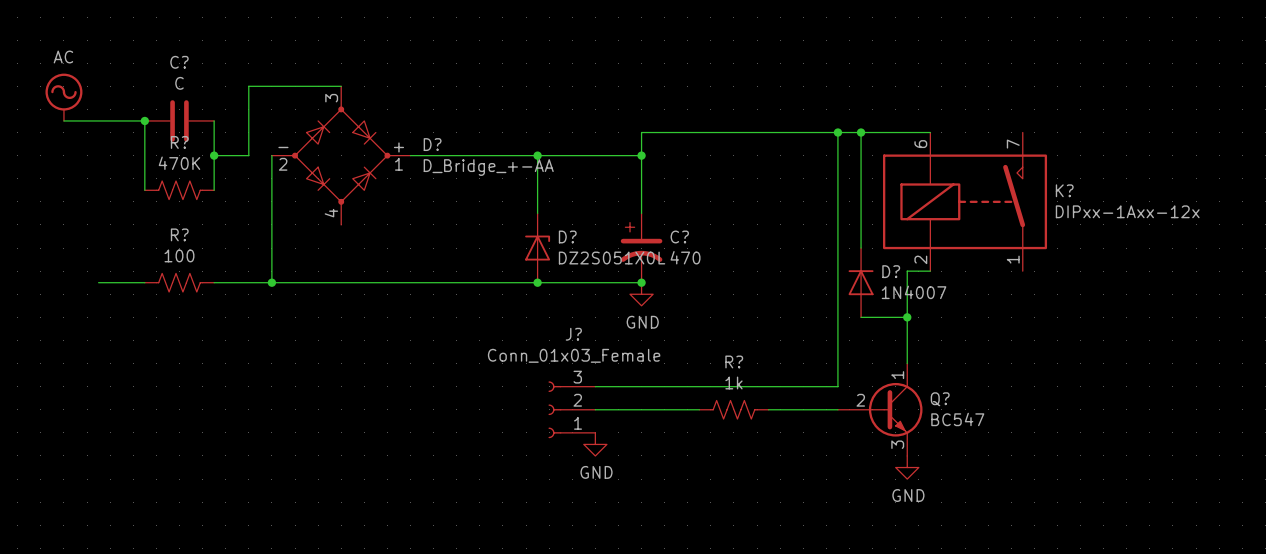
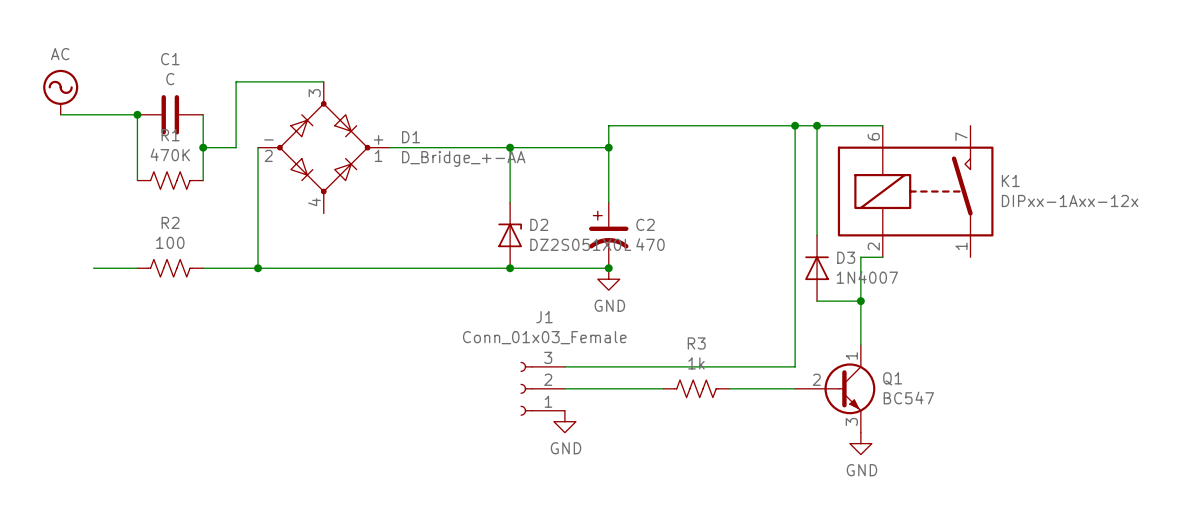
C? name: C? (179, 62) -> C1 (170, 59)
R? name: R? (179, 142) -> R1 (170, 135)
D? name: D? (432, 144) -> D1 (411, 137)
K? name: K? (1064, 190) -> K1 (1010, 181)
R? name: R? (179, 234) -> R2 (170, 222)
D? name: D? (567, 236) -> D2 (539, 224)
C? name: C? (679, 236) -> C2 (645, 224)
D? name: D? (891, 271) -> D3 (846, 257)
J? name: J? (573, 334) -> J1 (544, 317)
R? name: R? (734, 361) -> R3 (696, 343)
Q? name: Q? (940, 399) -> Q1 (892, 378)

